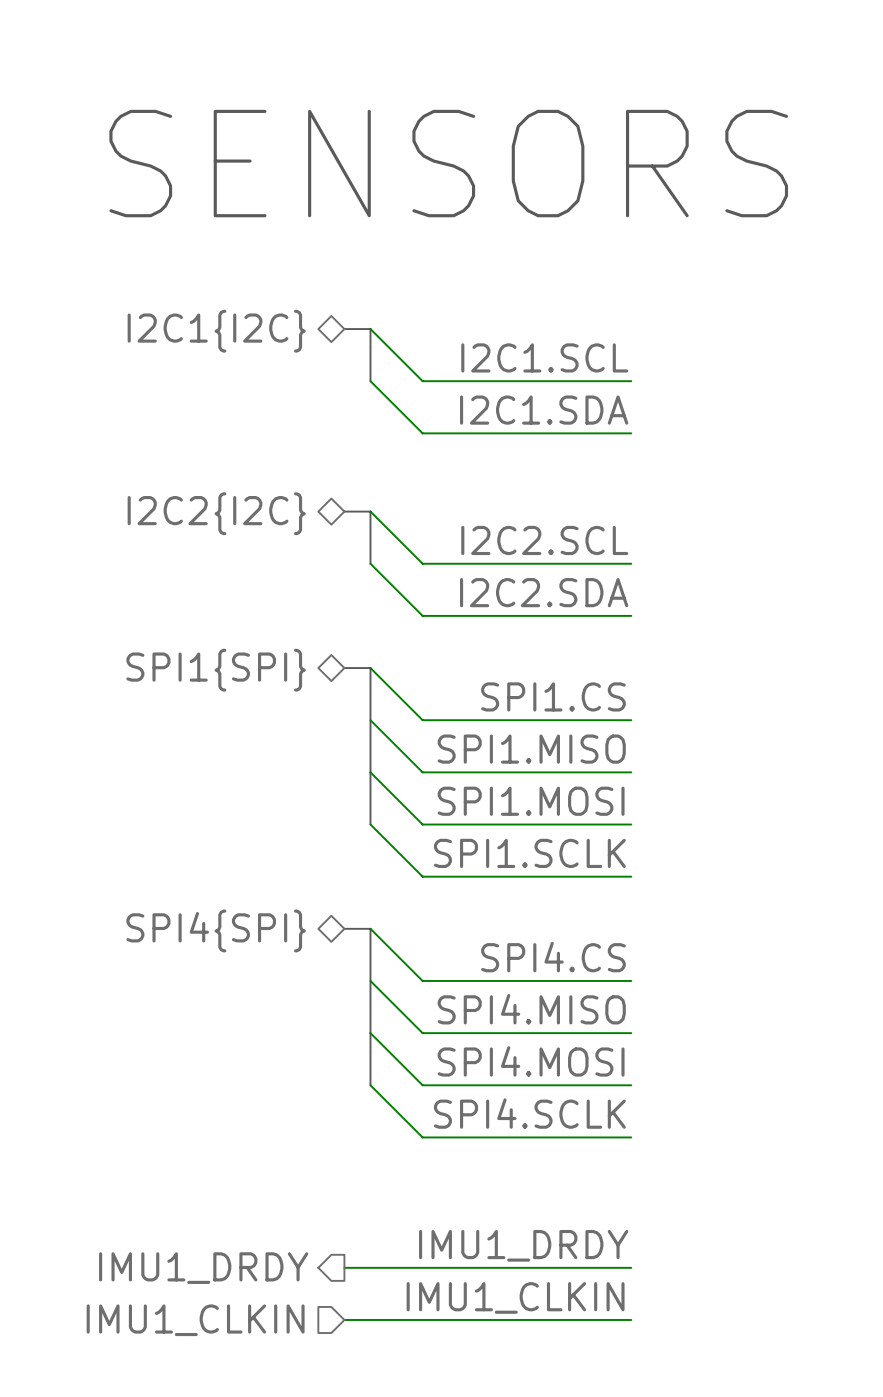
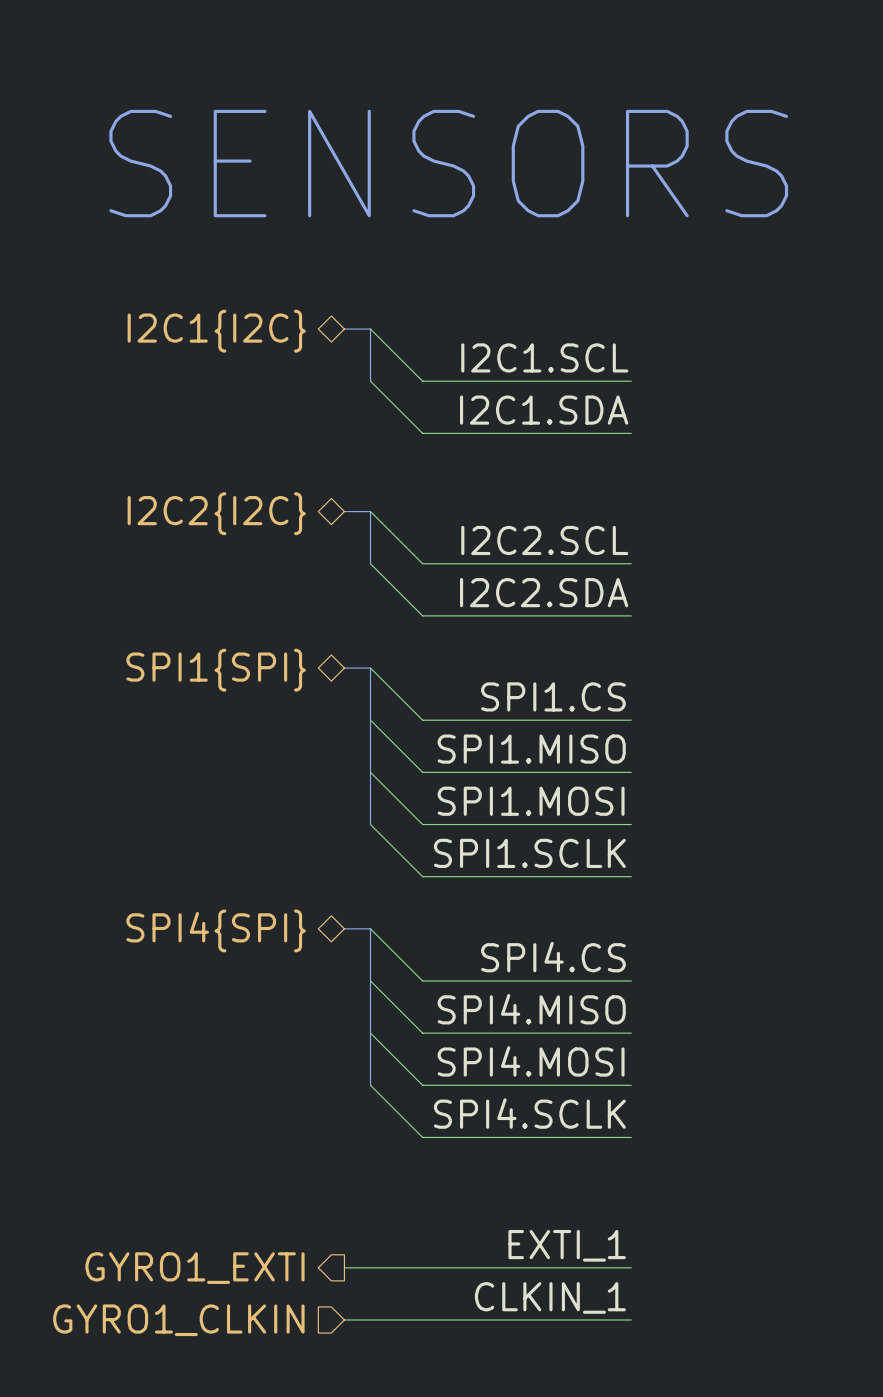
label: IMU1_DRDY (523, 1245) -> EXTI_1 (567, 1245)
hierarchical label: IMU1_DRDY (203, 1268) -> GYRO1_EXTI (194, 1268)
label: IMU1_CLKIN (515, 1297) -> CLKIN_1 (550, 1297)
hierarchical label: IMU1_CLKIN (195, 1320) -> GYRO1_CLKIN (178, 1320)

